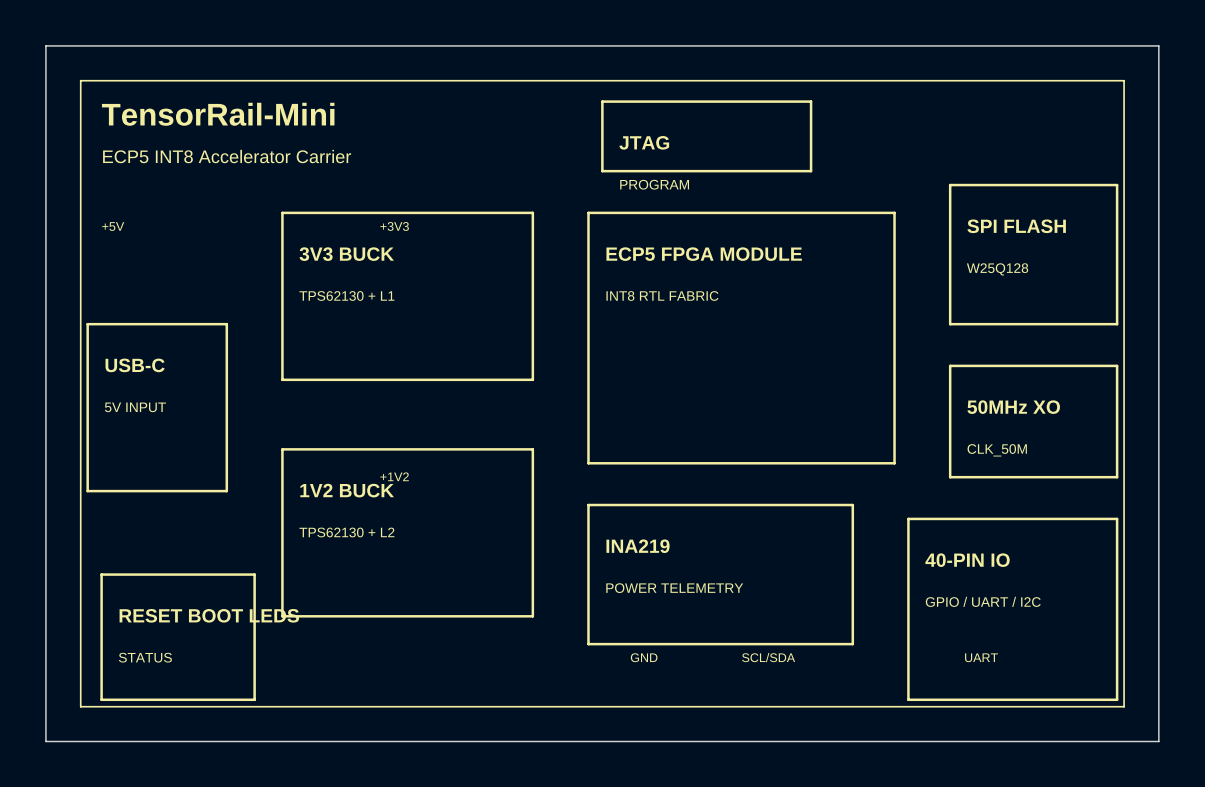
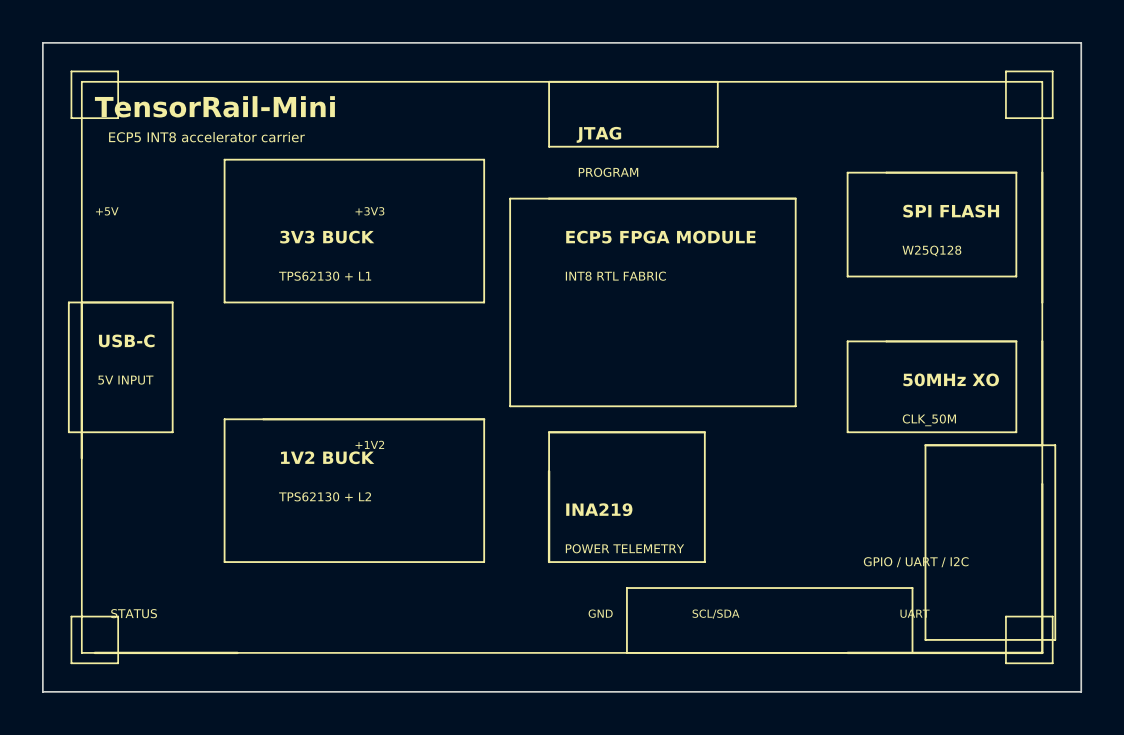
line: none -> (71, 71) (118, 71) (118, 118) (71, 118) (71, 71)
line: none -> (1005, 71) (1052, 71) (1052, 118) (1005, 118) (1005, 71)
line: (80, 80) (1124, 80) (1124, 706) (80, 706) (80, 80) -> none
line: (602, 101) (811, 101) (811, 171) (602, 171) (602, 101) -> (549, 81) (549, 146) (717, 146) (717, 81) (549, 81)
text: ECP5 INT8 Accelerator Carrier (227, 156) -> ECP5 INT8 accelerator carrier (206, 137)
line: none -> (224, 159) (484, 159) (484, 302) (224, 302) (224, 159)
line: (950, 185) (950, 324) (1117, 324) -> (886, 172) (847, 172) (847, 276) (1016, 276) (1016, 172)
line: (1089, 185) (1117, 185) -> (172, 302) (172, 432) (68, 432) (68, 302) (81, 302) (81, 81) (1042, 81) (1042, 172)
line: (282, 212) (532, 212) (532, 379) (282, 379) (282, 212) -> none
line: (588, 212) (588, 463) -> none
line: (852, 212) (894, 212) (894, 463) (755, 463) -> (795, 198) (795, 406) (510, 406) (510, 198) (549, 198)
line: (185, 324) (226, 324) (226, 491) (87, 491) -> none
line: (950, 365) (950, 477) (991, 477) -> (886, 341) (847, 341) (847, 432) (1016, 432) (1016, 341)
line: (1089, 365) (1117, 365) -> (1042, 302) (1042, 341)
line: (282, 449) (282, 616) (532, 616) (532, 449) (518, 449) -> (263, 419) (224, 419) (224, 562) (484, 562) (484, 419)
line: none -> (704, 432) (704, 562) (549, 562)
line: (588, 505) (852, 505) (852, 644) (588, 644) (588, 602) -> (549, 471) (549, 432)
line: (1117, 518) (908, 518) (908, 699) -> (1042, 484) (1042, 445) (1055, 445) (1055, 639) (925, 639) (925, 445)
text: 40-PIN IO (967, 560) -> none
text: RESET BOOT LEDS (209, 615) -> none
line: none -> (71, 616) (71, 663) (118, 663) (118, 616) (71, 616)
line: none -> (1005, 616) (1005, 663) (1052, 663) (1052, 616) (1005, 616)
line: (101, 699) (101, 574) (254, 574) (254, 699) -> (94, 652) (81, 652) (81, 458)
line: none -> (237, 652) (847, 652) (626, 652) (626, 588) (912, 588) (912, 652)

